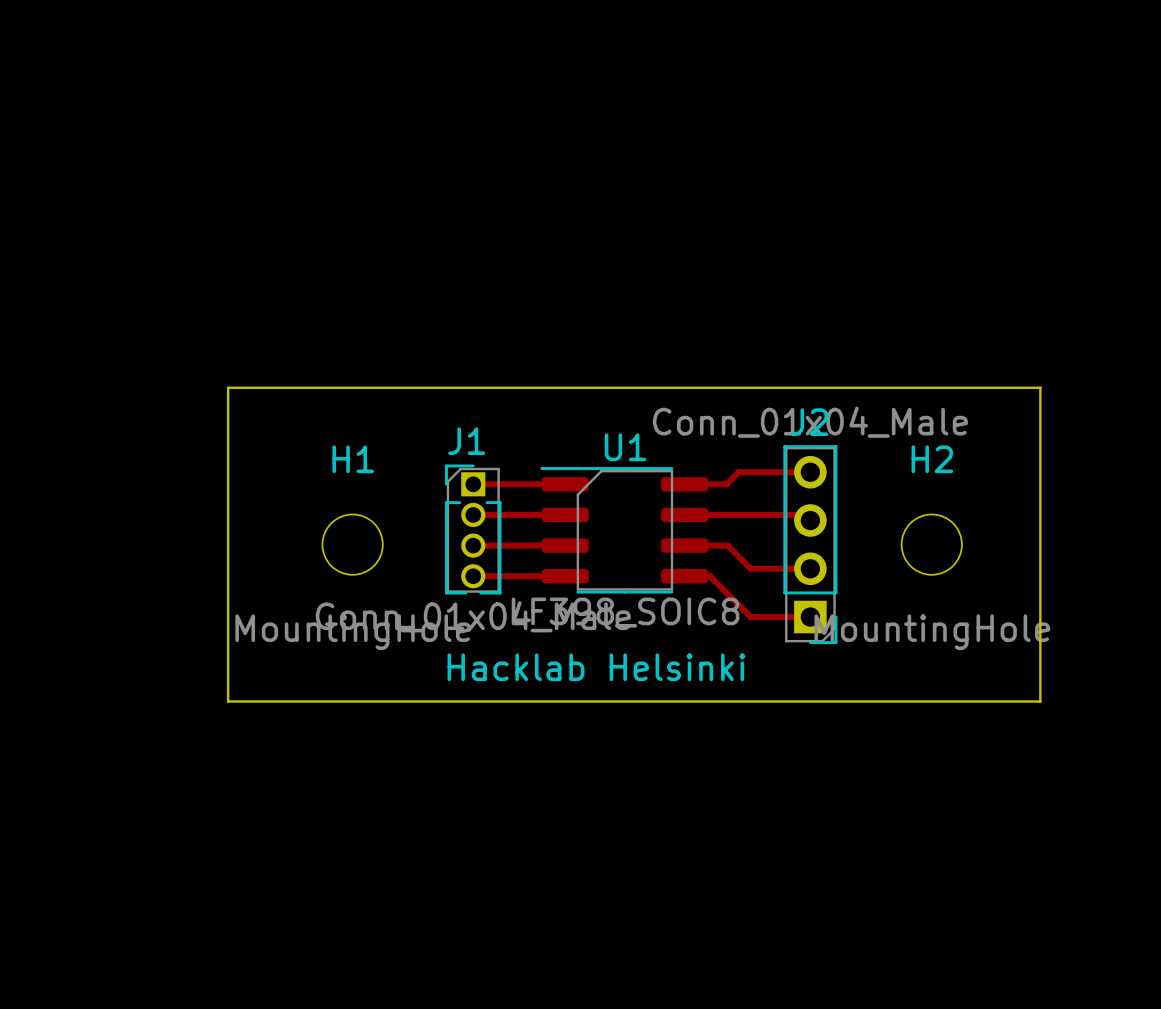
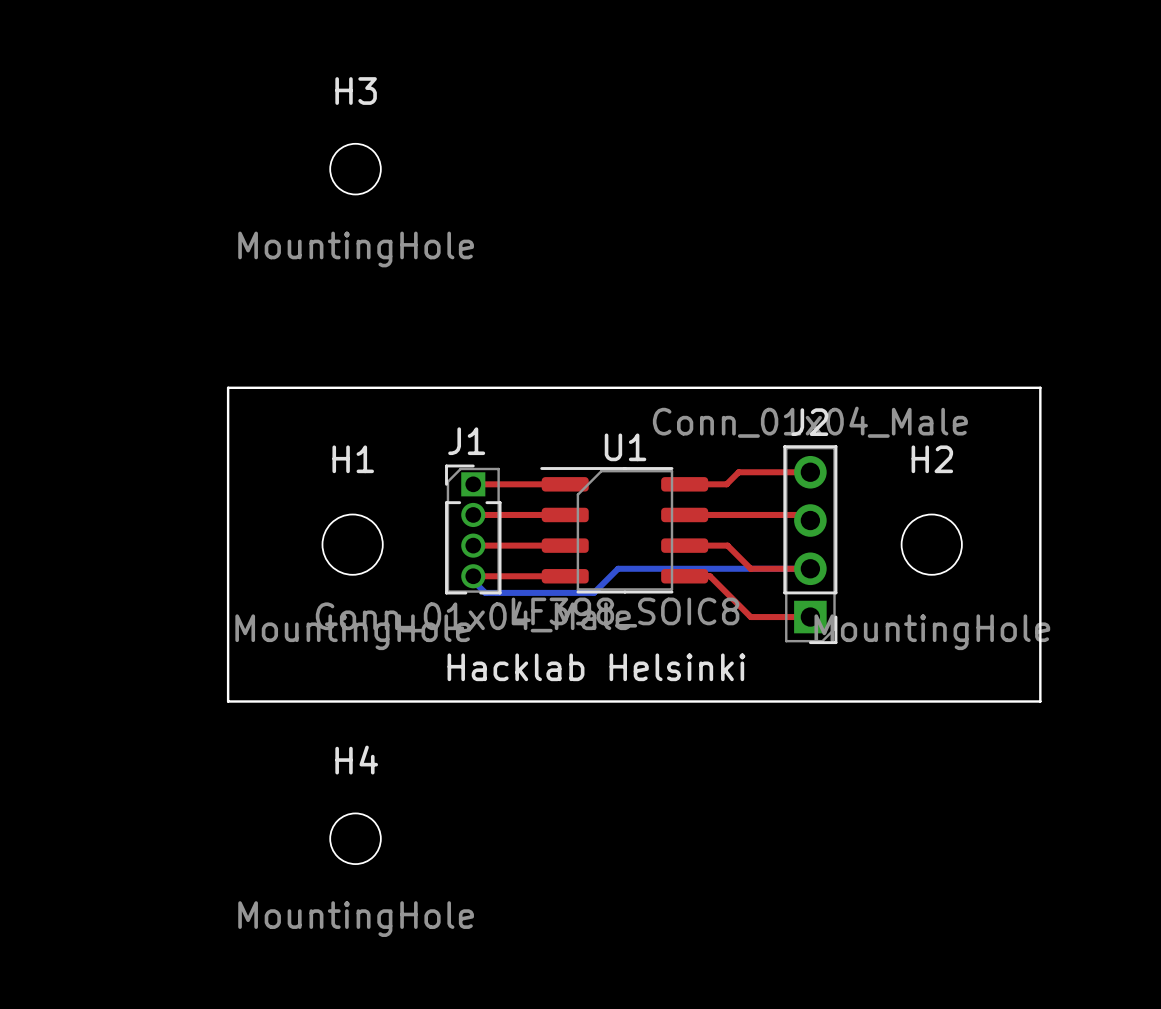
H3: none -> MountingHole (355, 169)
bottom track: none -> (810, 568) (618, 568) (593, 592) (485, 592) (473, 580)
H4: none -> MountingHole (355, 838)

